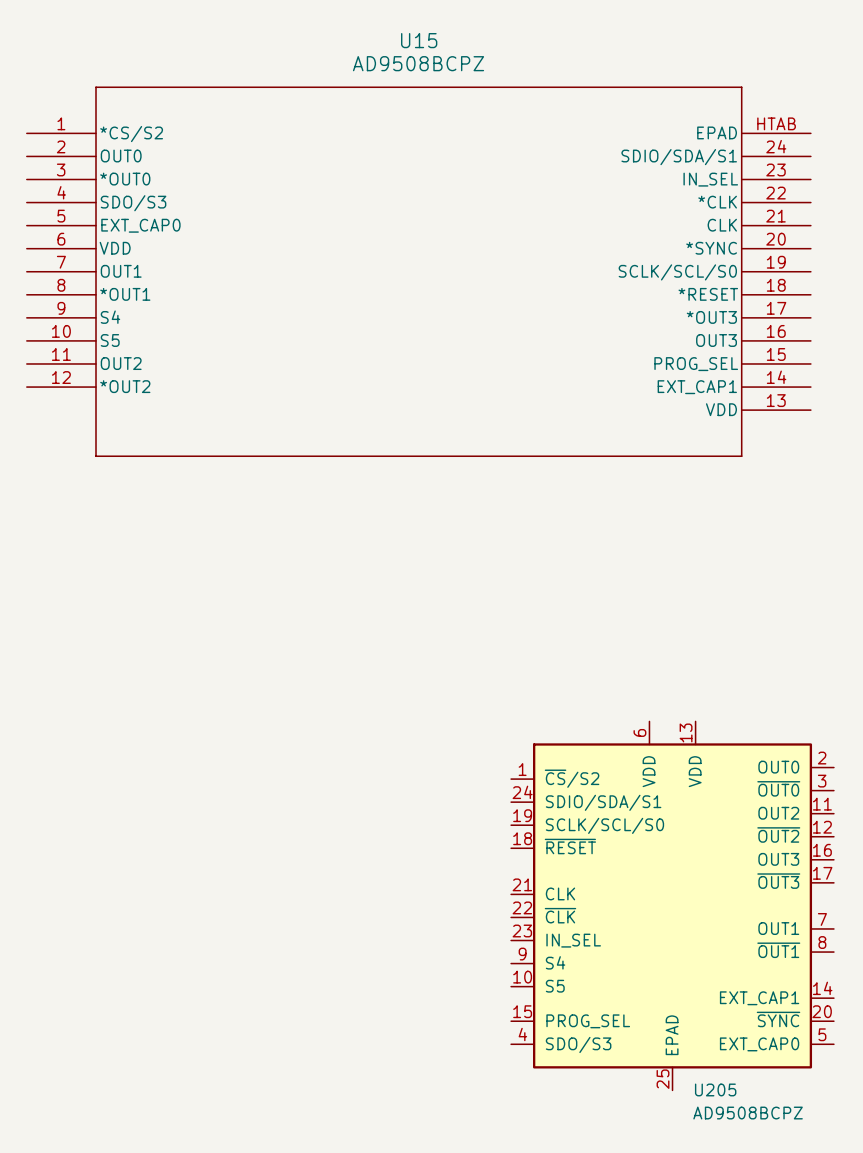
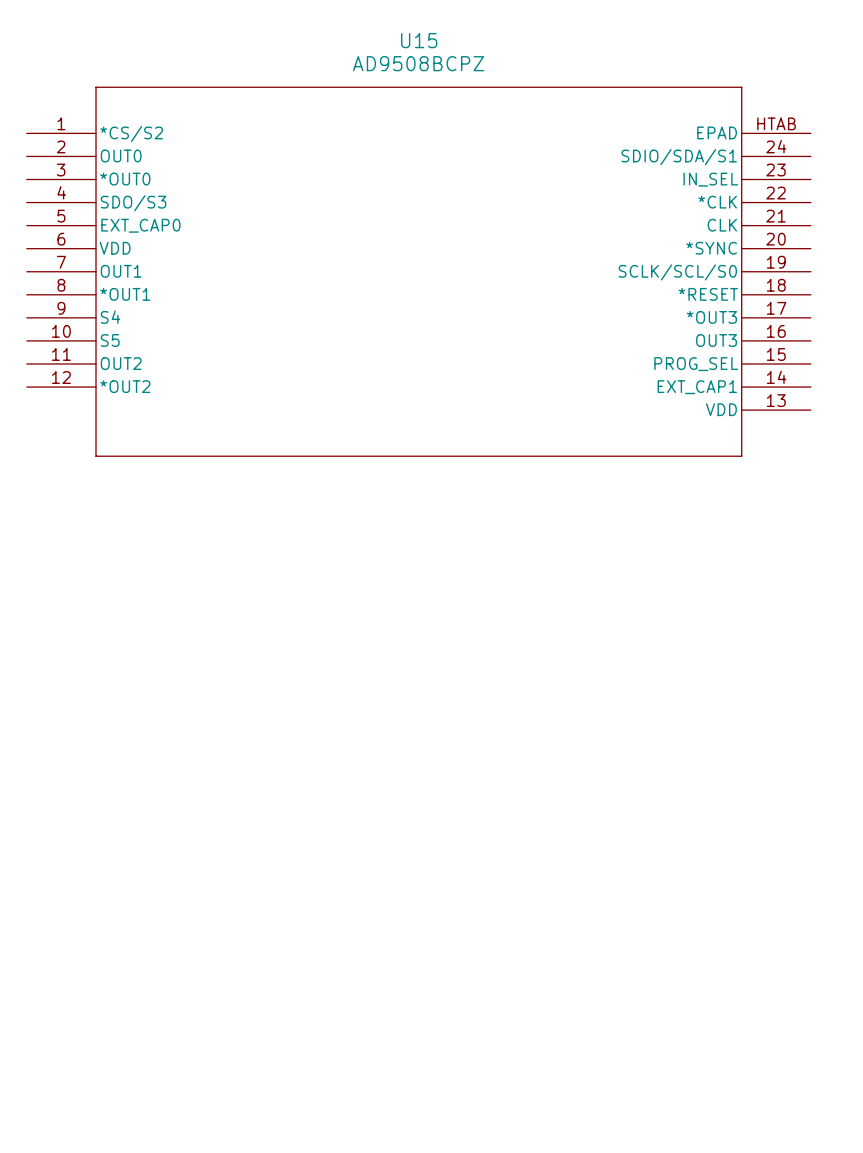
U205: AD9508BCPZ (672, 905) -> none

